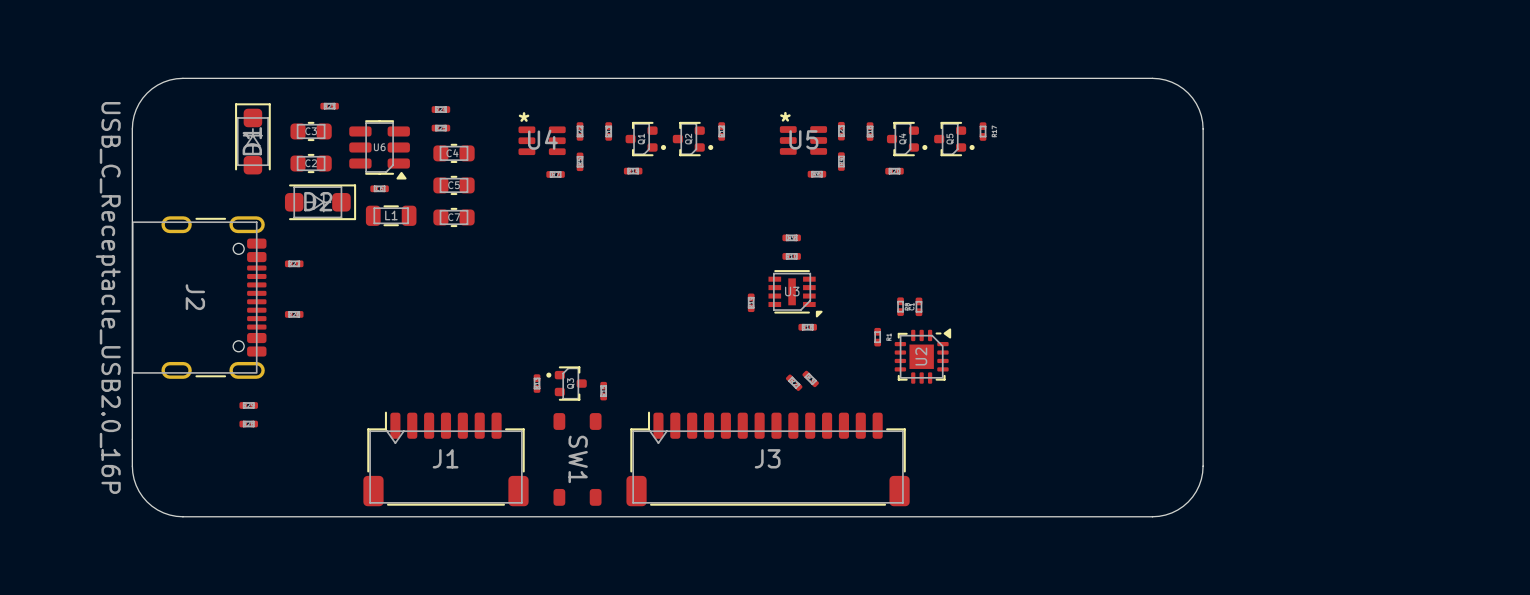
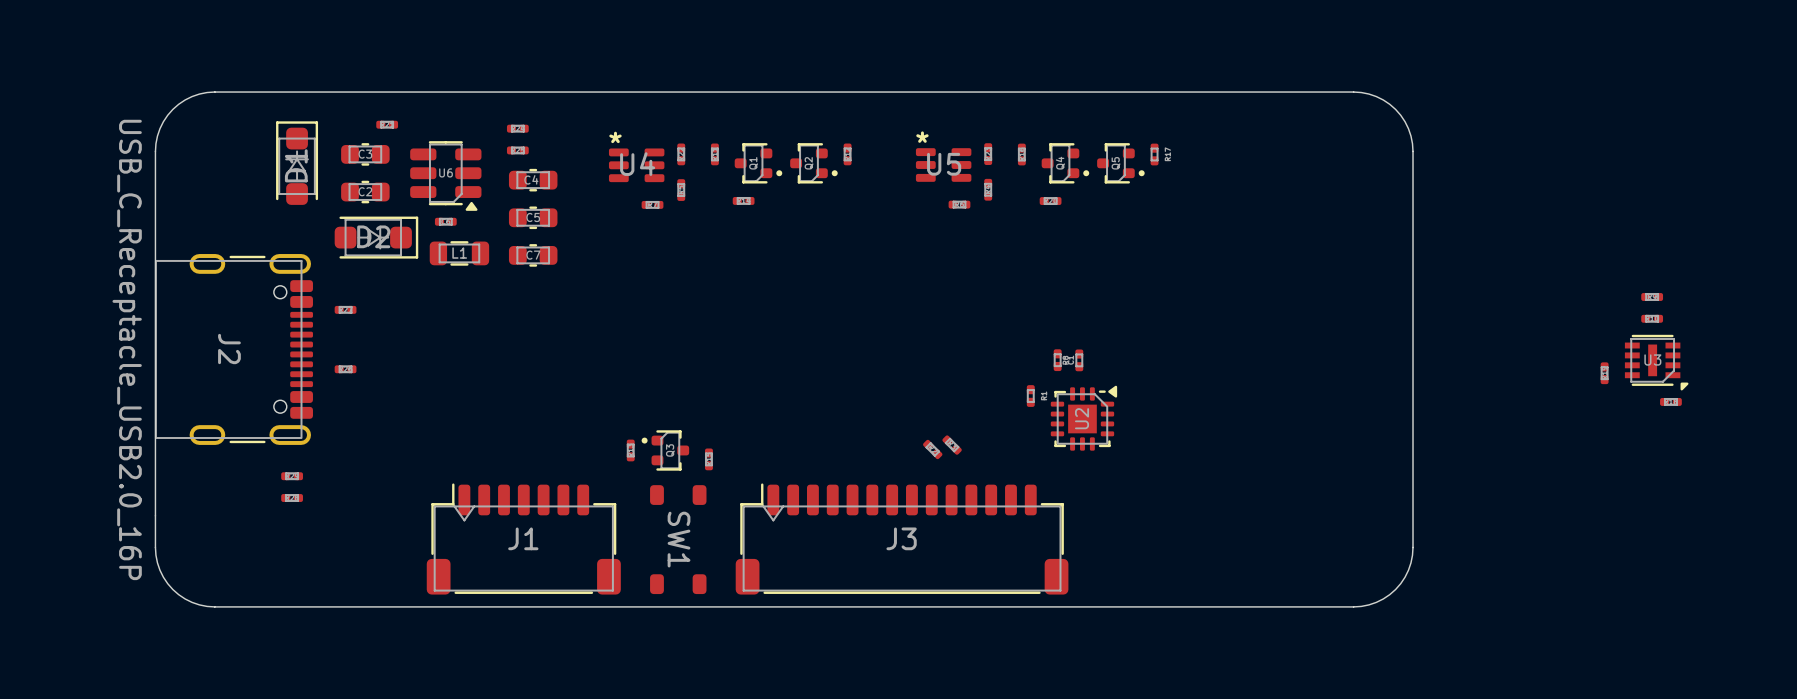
part position: (791, 237) -> (1652, 296)
part position: (791, 256) -> (1652, 318)
U3 position: (795, 293) -> (1656, 362)
part position: (751, 302) -> (1604, 373)
part position: (807, 327) -> (1670, 401)

